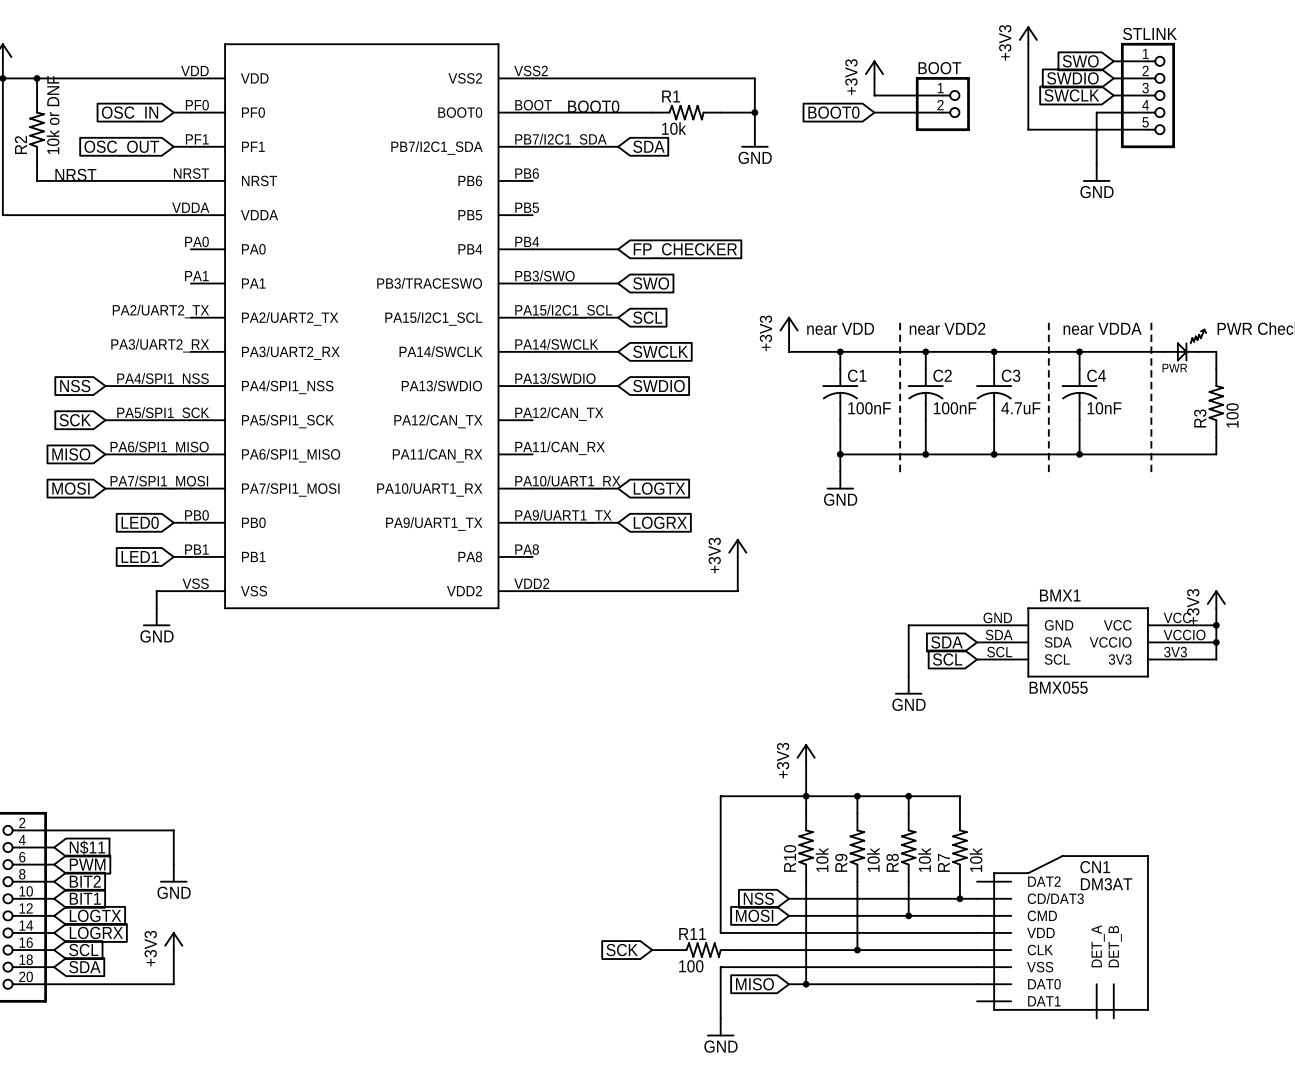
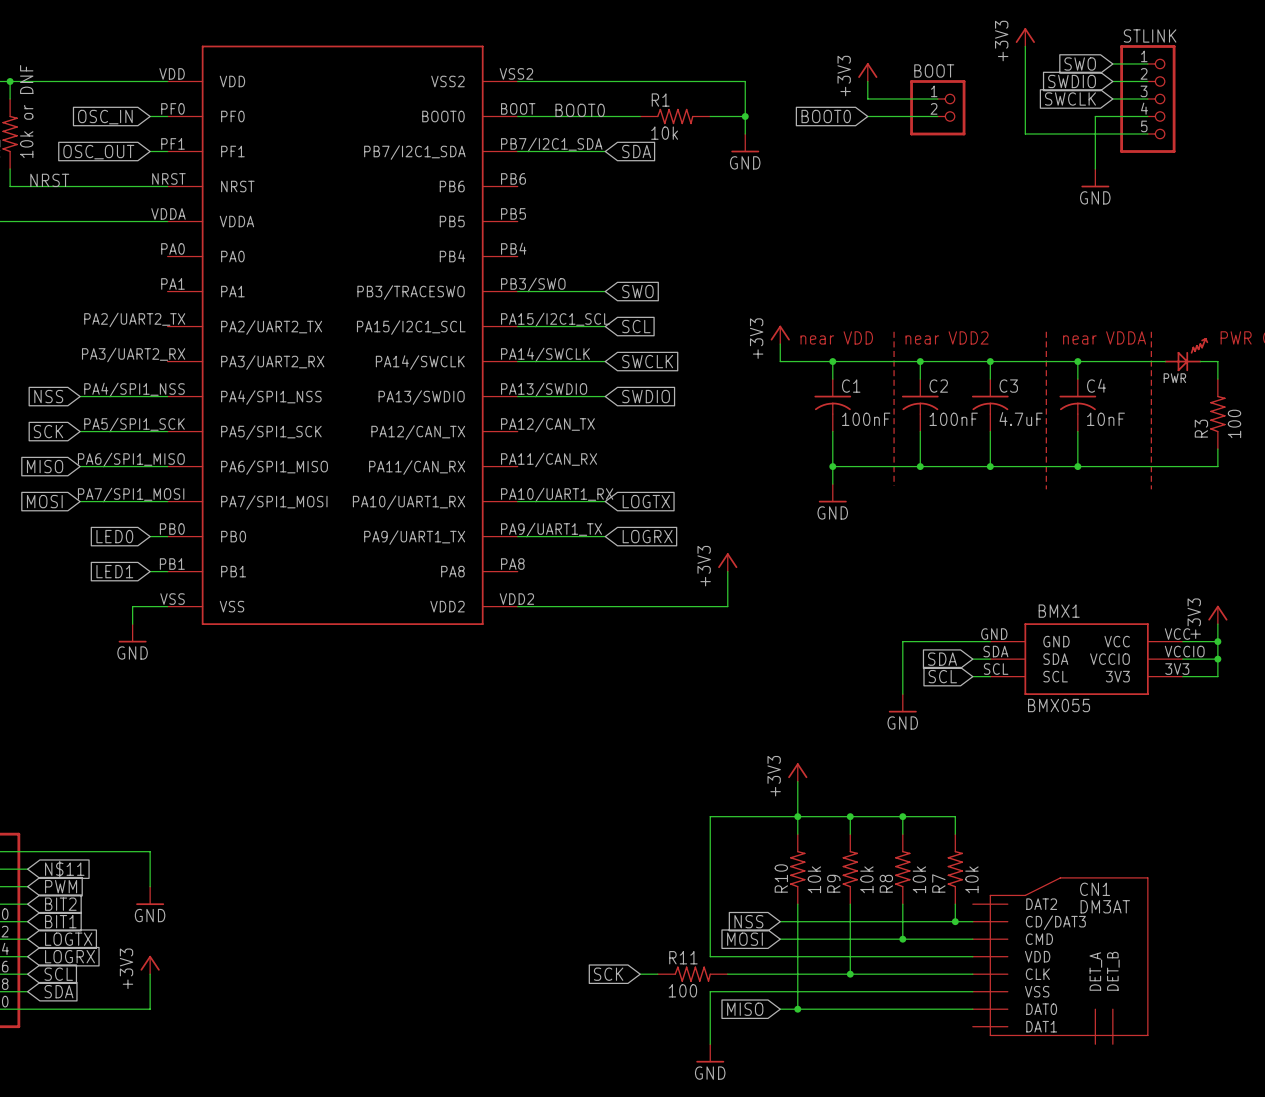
wire: (532, 249) (618, 249) -> none
global label: FP_CHECKER (685, 250) -> none

